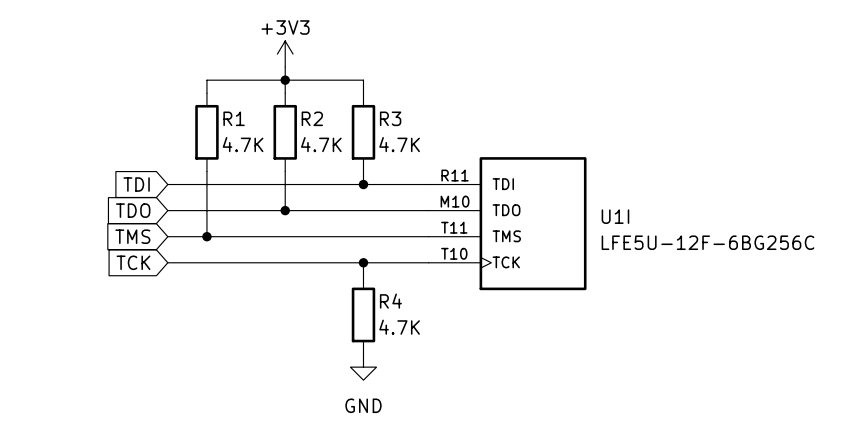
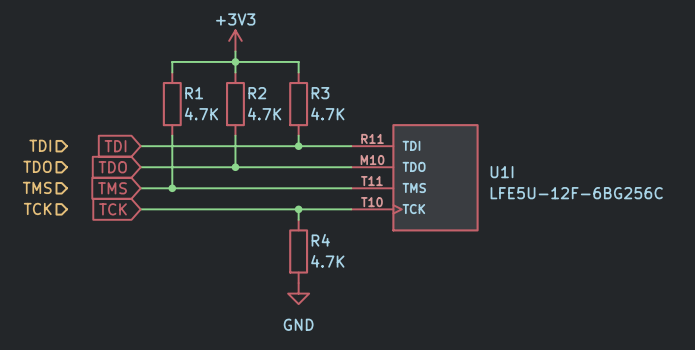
hierarchical label: none -> TDI (40, 145)
hierarchical label: none -> TDO (37, 166)
hierarchical label: none -> TMS (37, 187)
hierarchical label: none -> TCK (37, 208)

